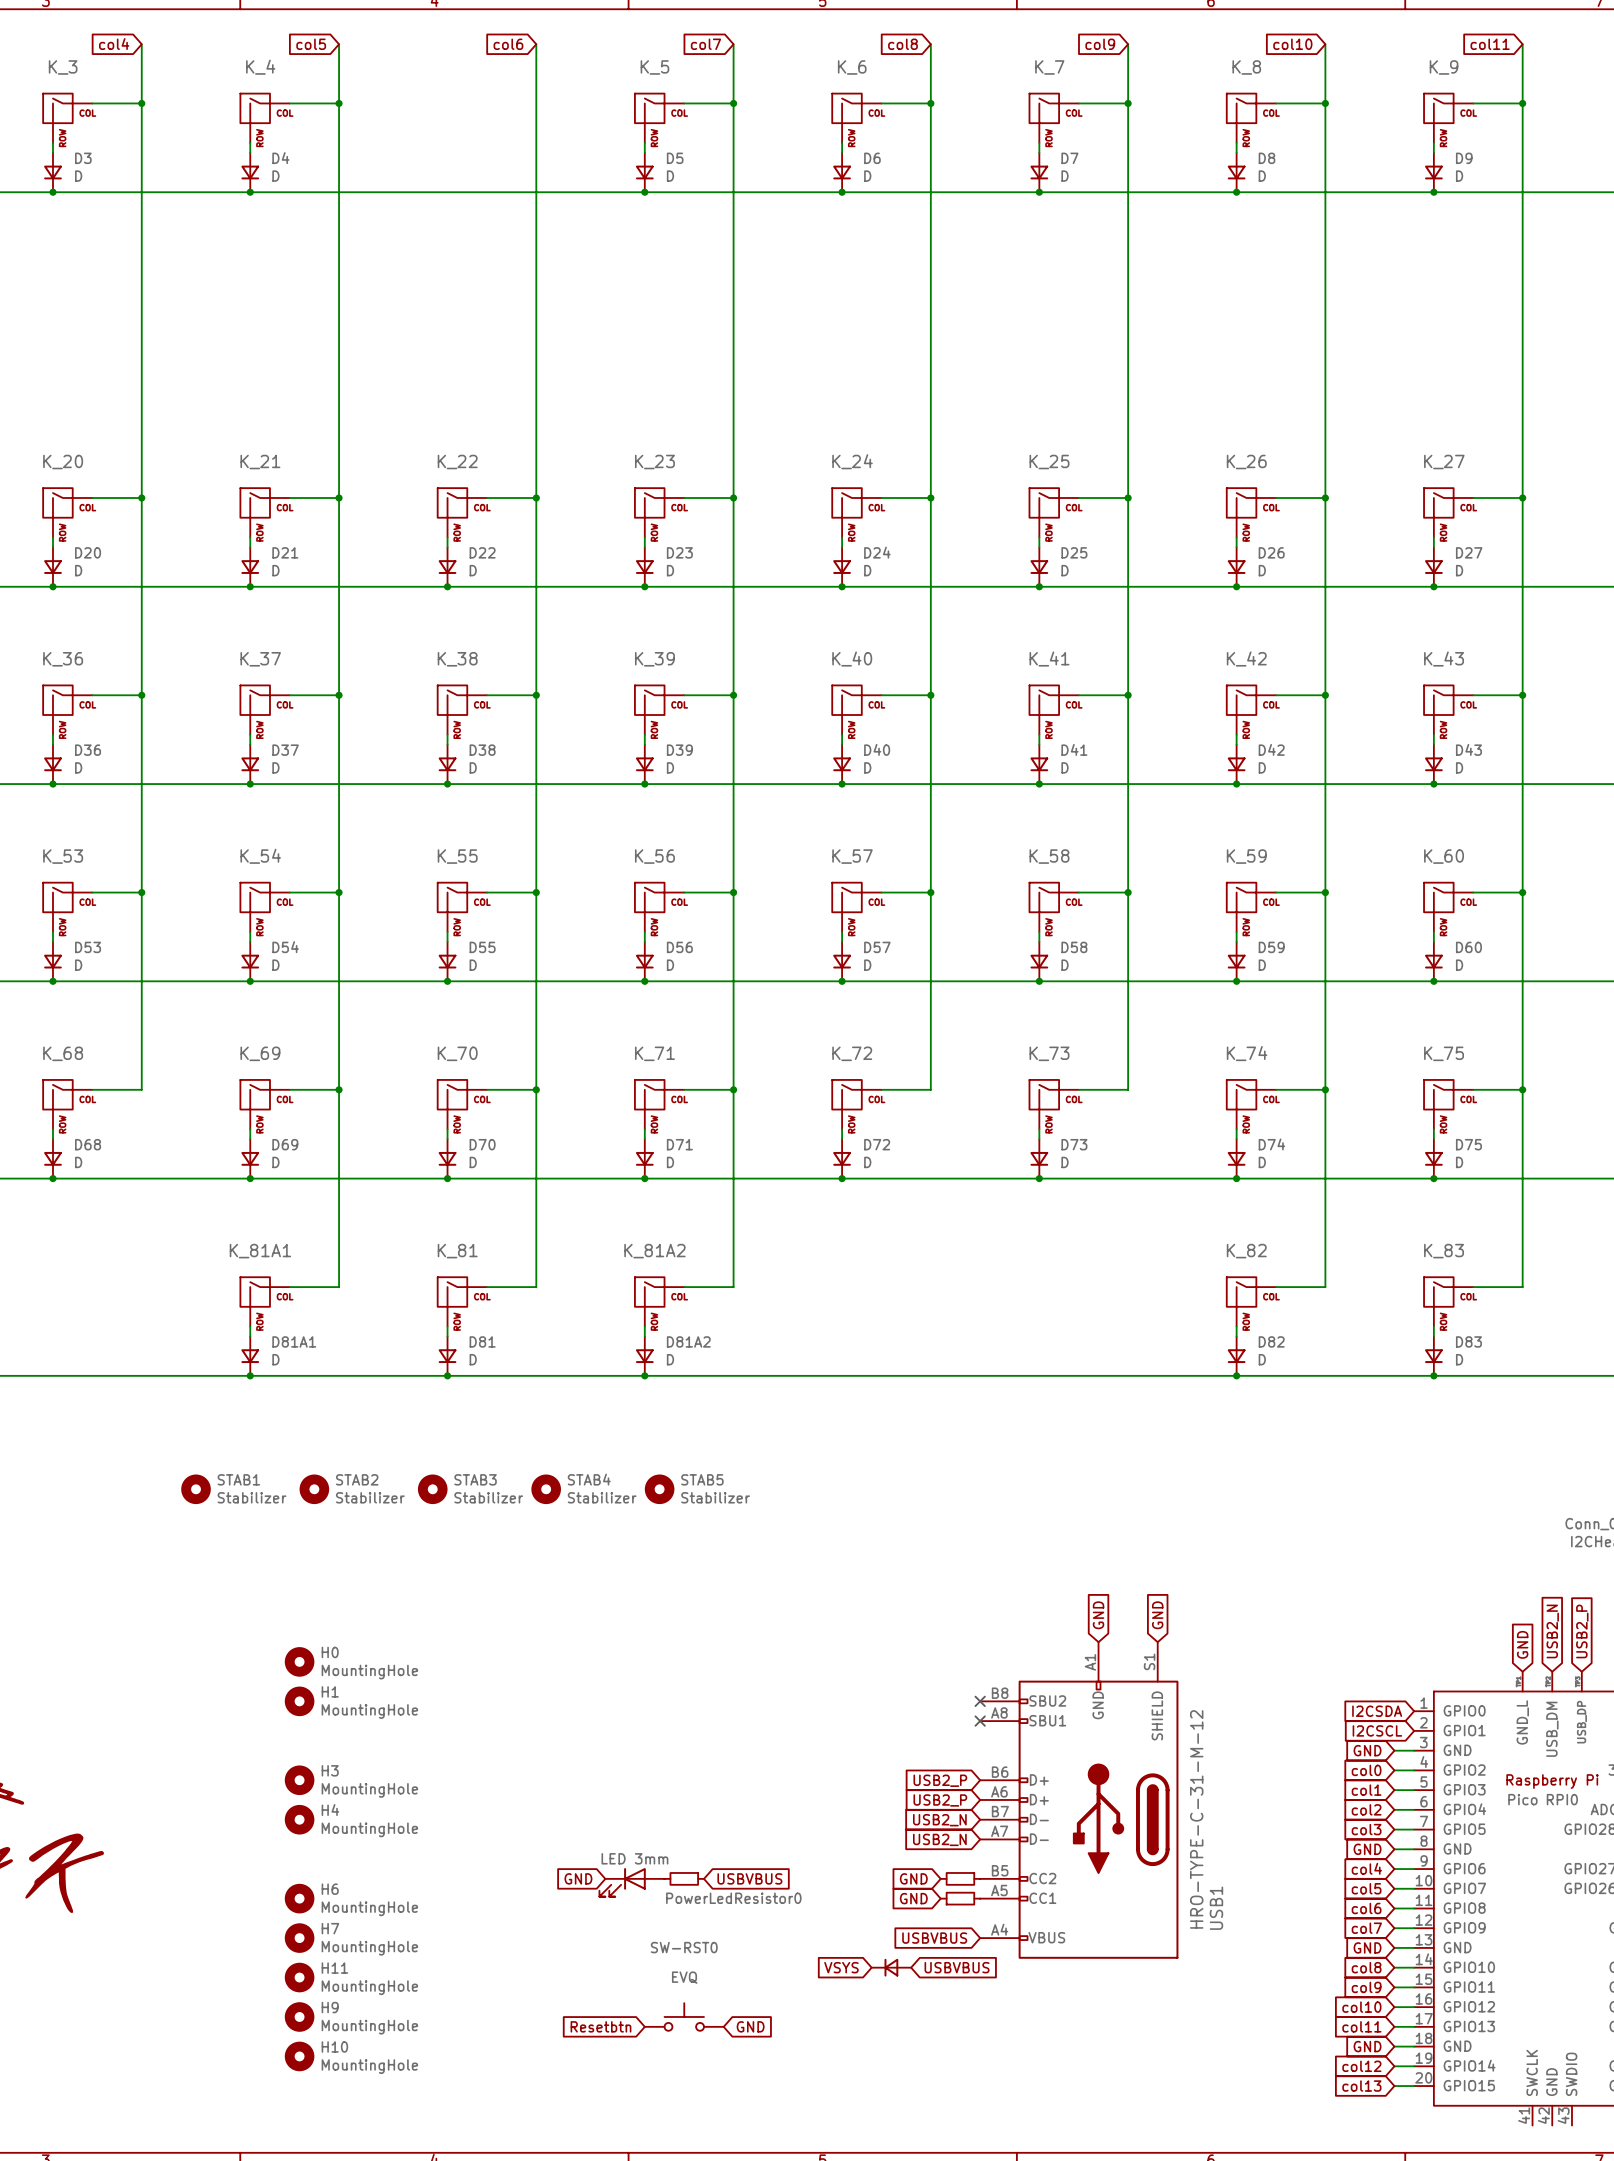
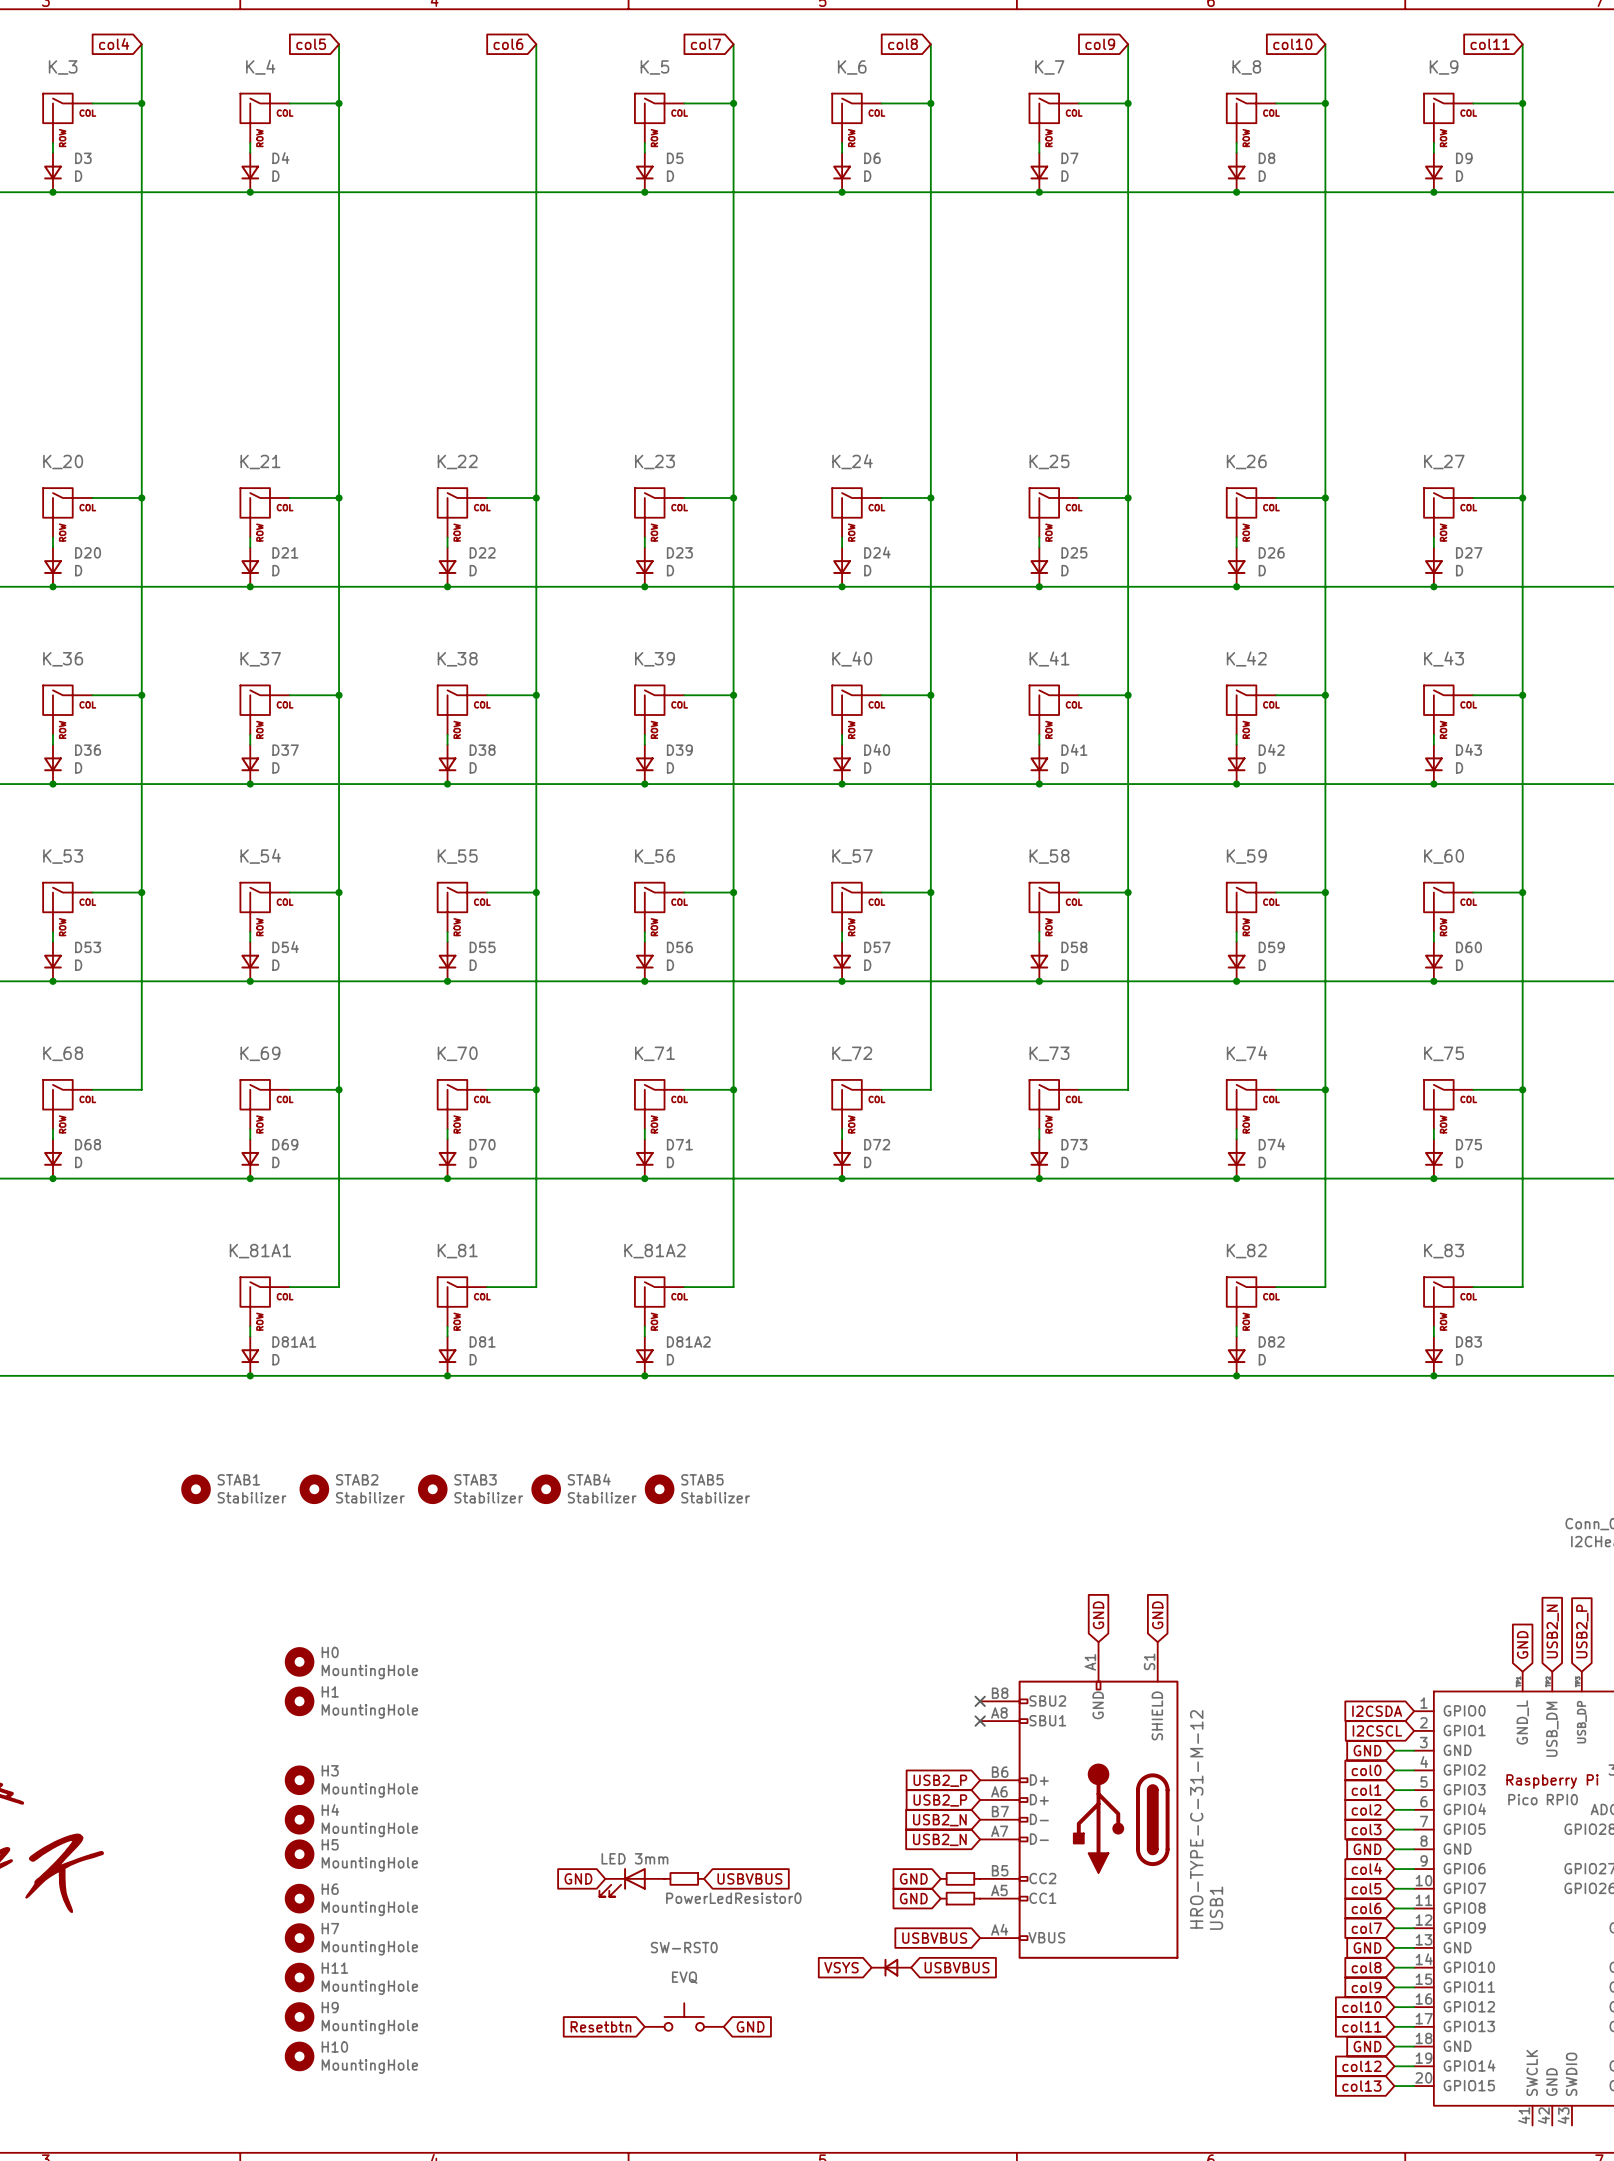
H5: none -> MountingHole (299, 1854)

